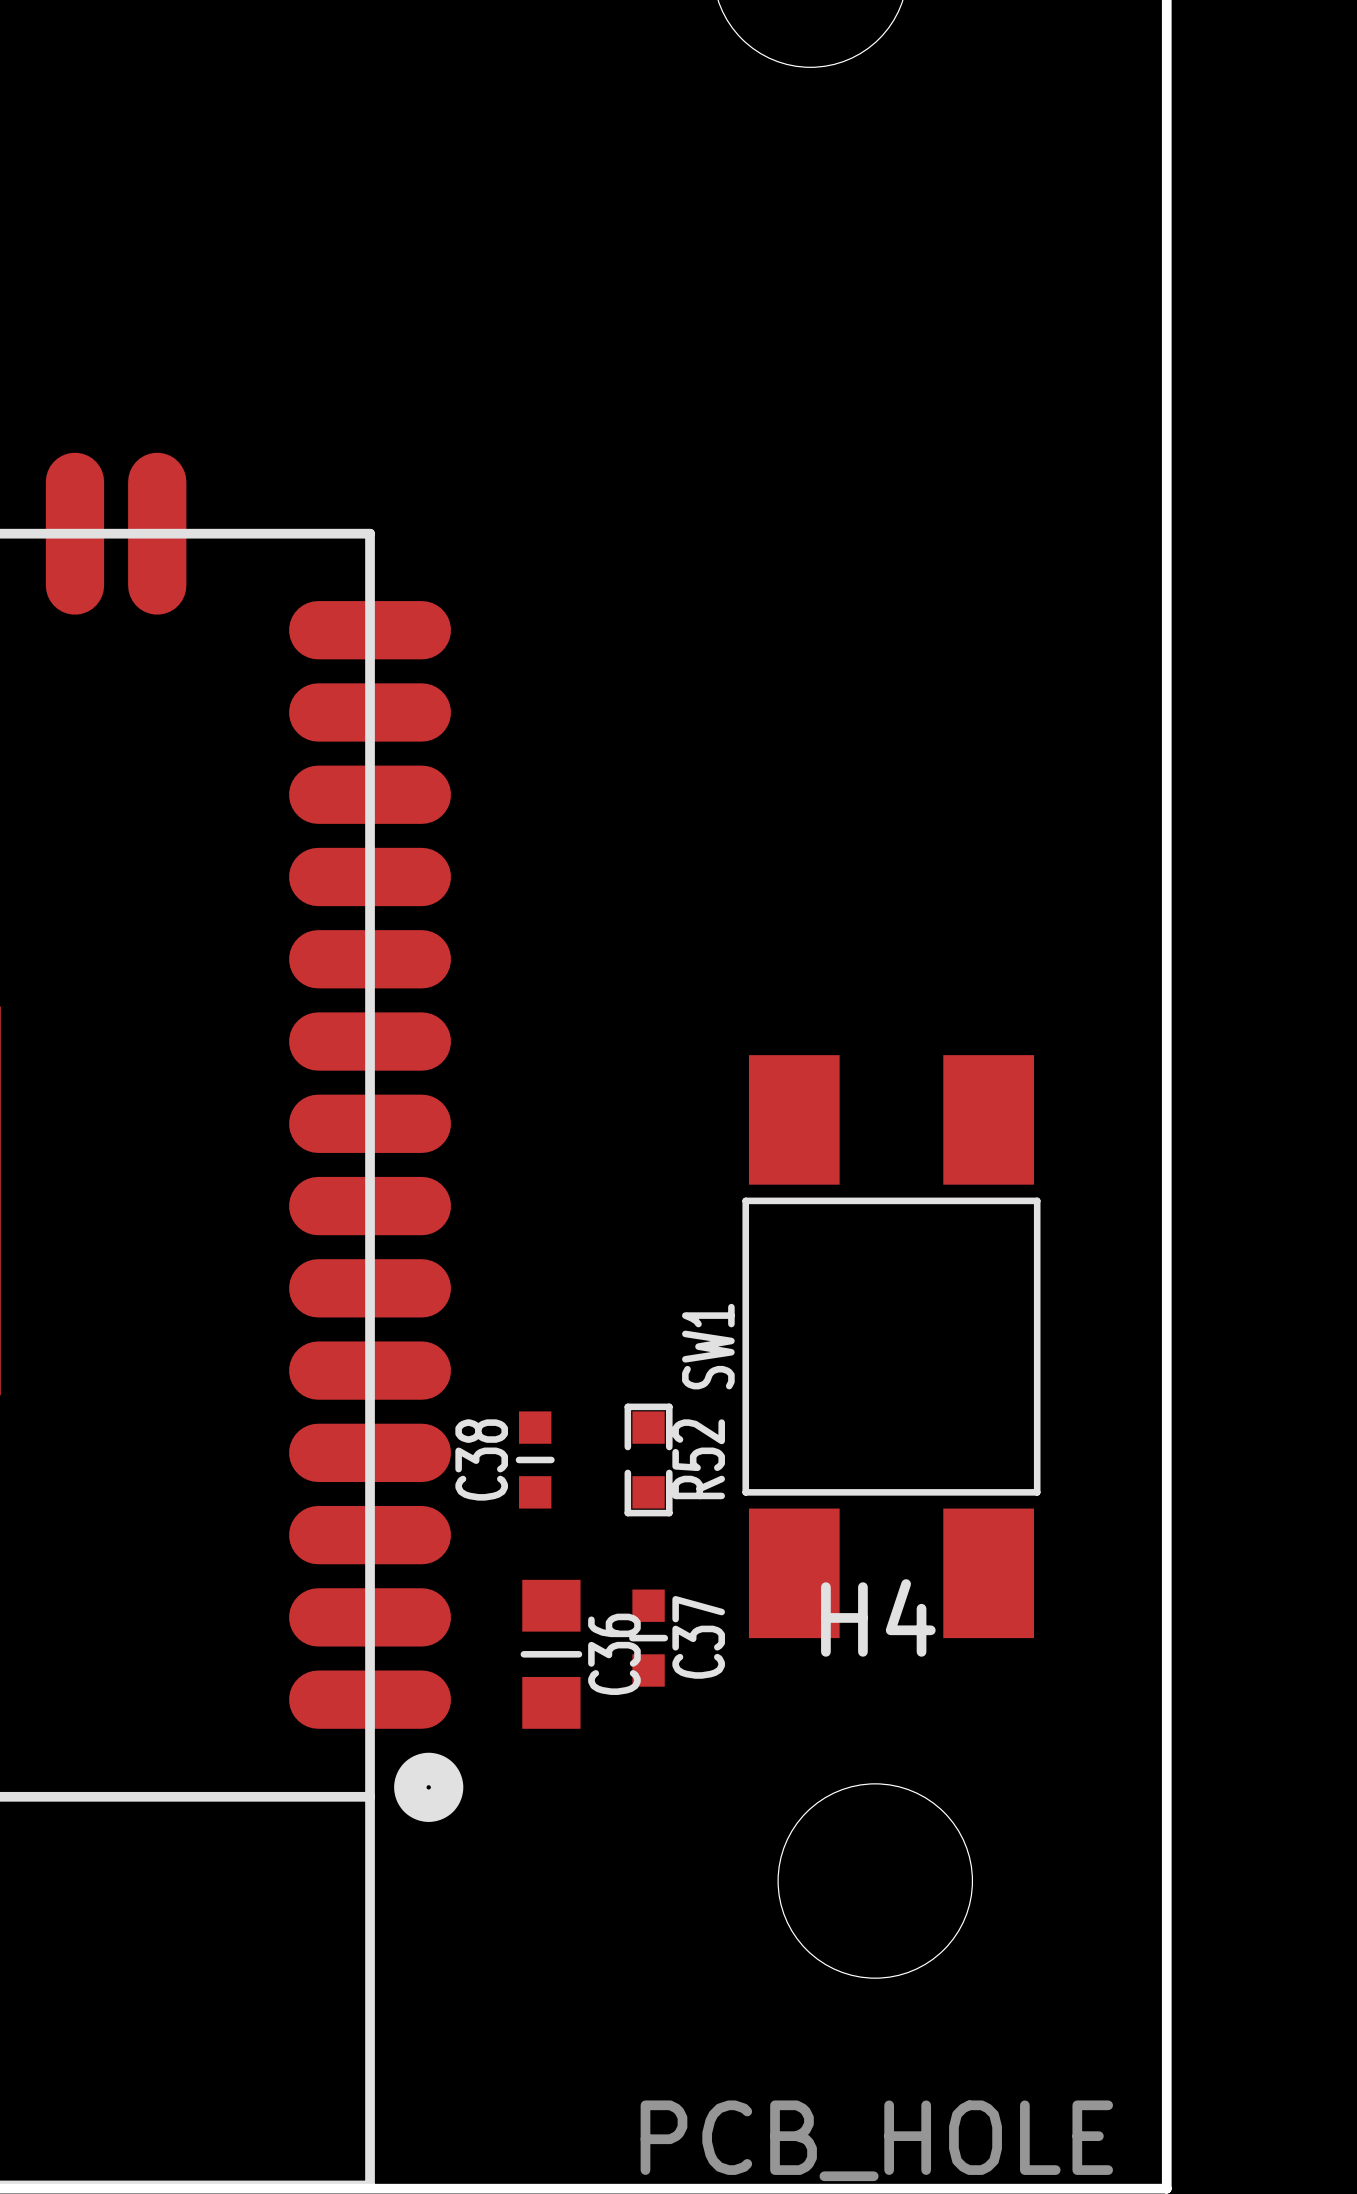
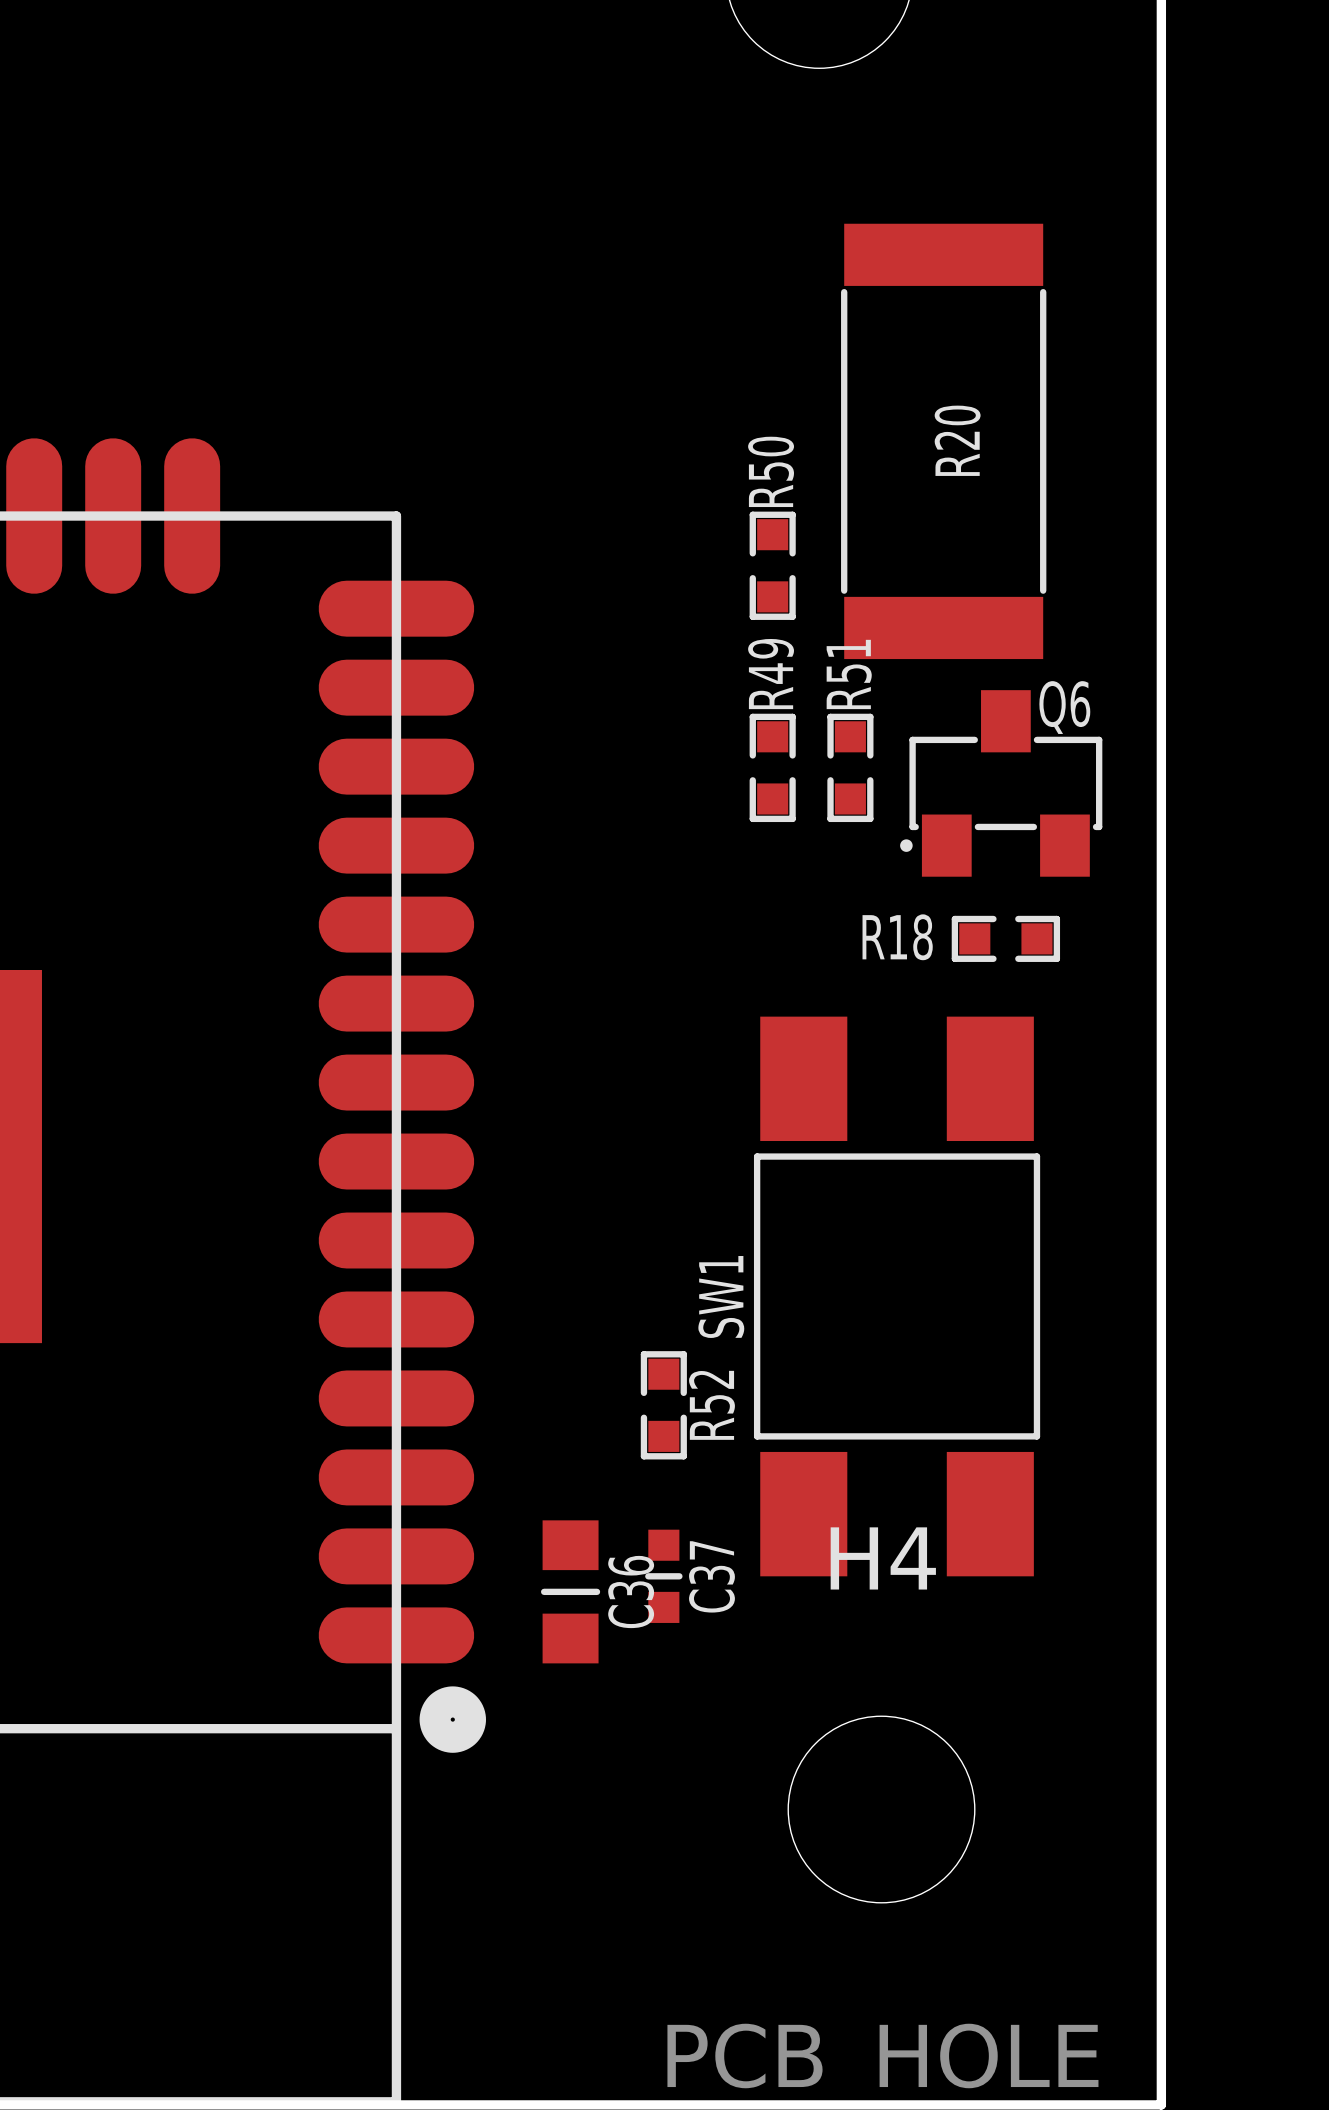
R20: none -> (943, 441)
R50: none -> (772, 565)
R49: none -> (772, 767)
R51: none -> (850, 767)
Q6: none -> (1001, 783)
R18: none -> (1005, 938)
C38: (535, 1459) -> none

